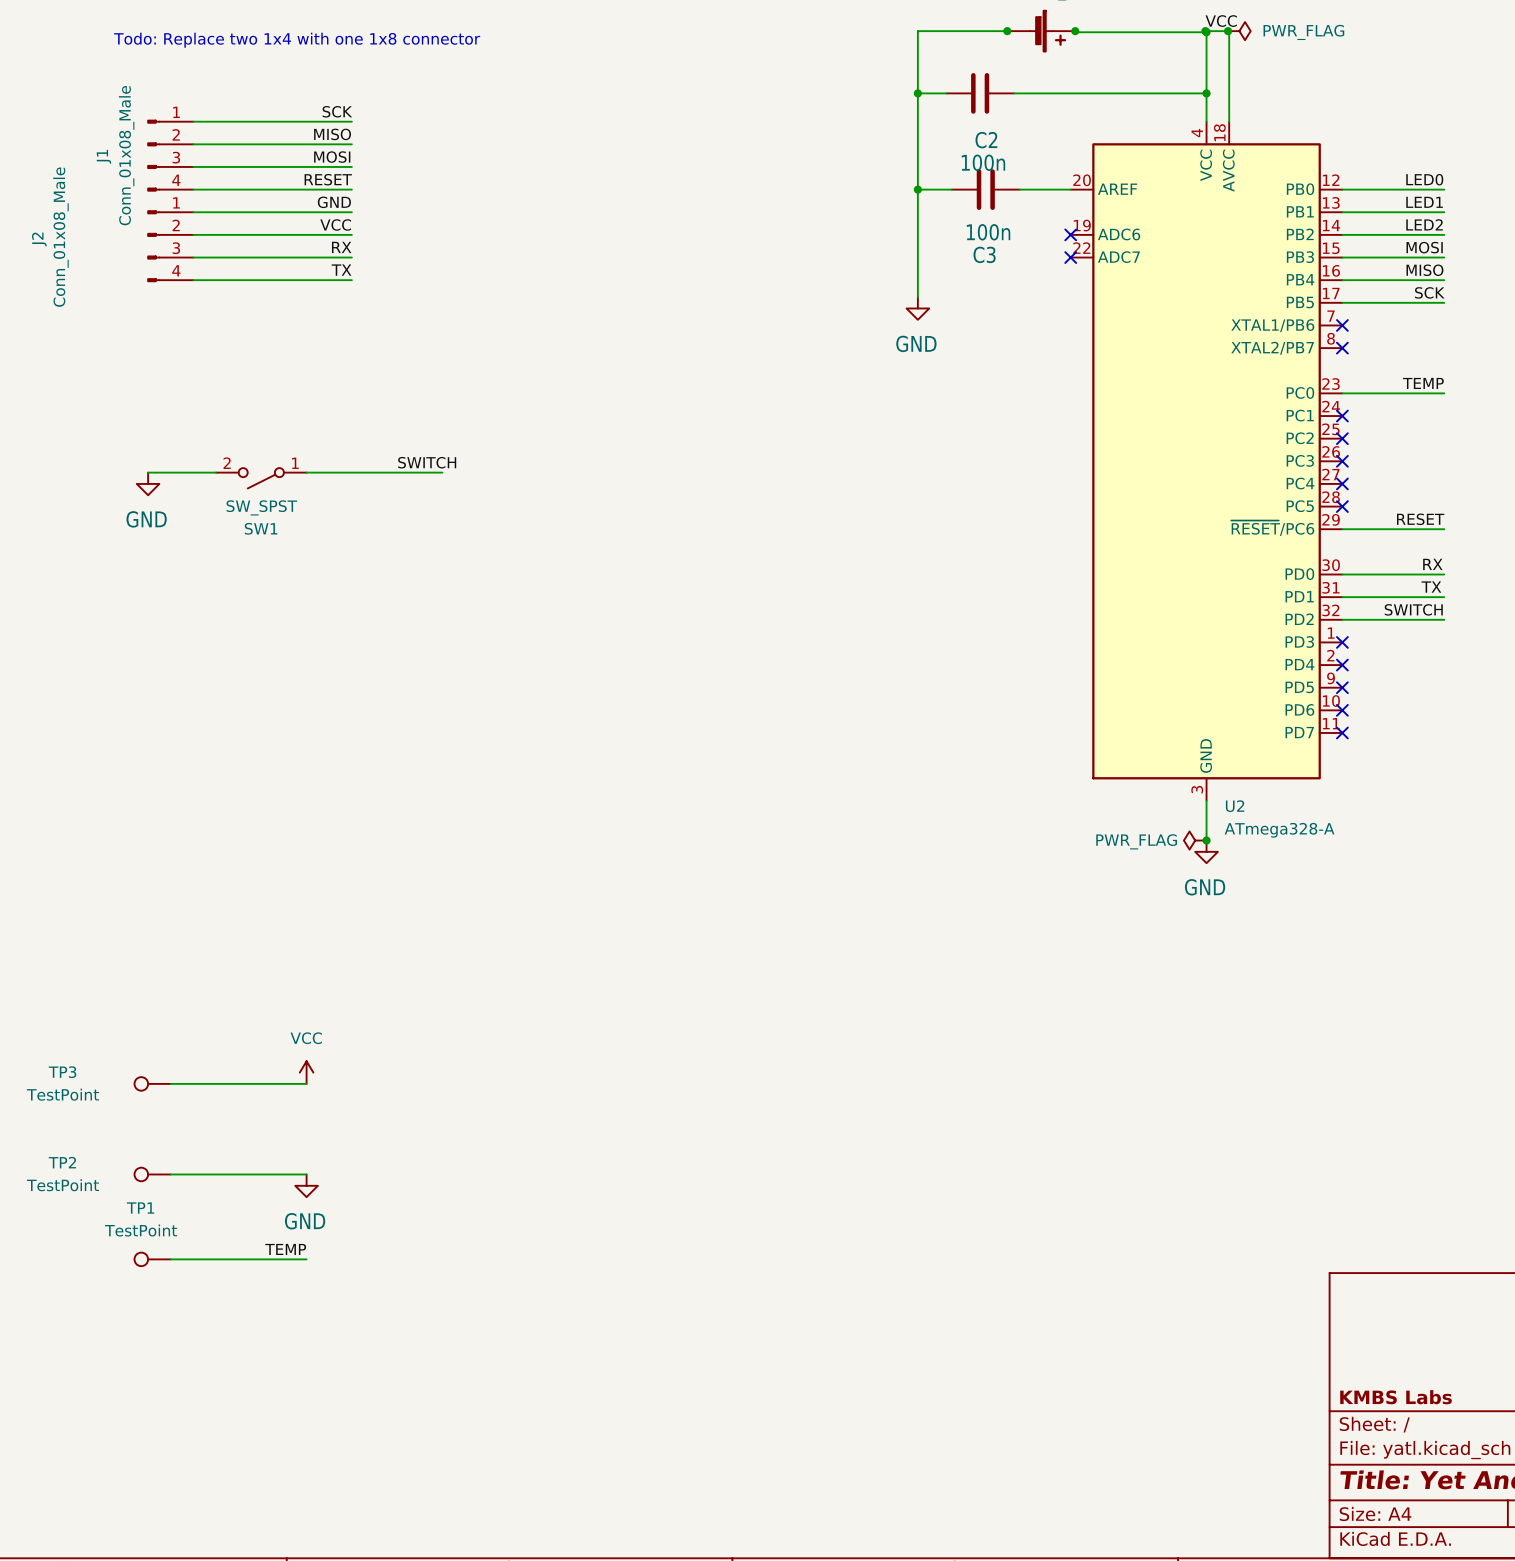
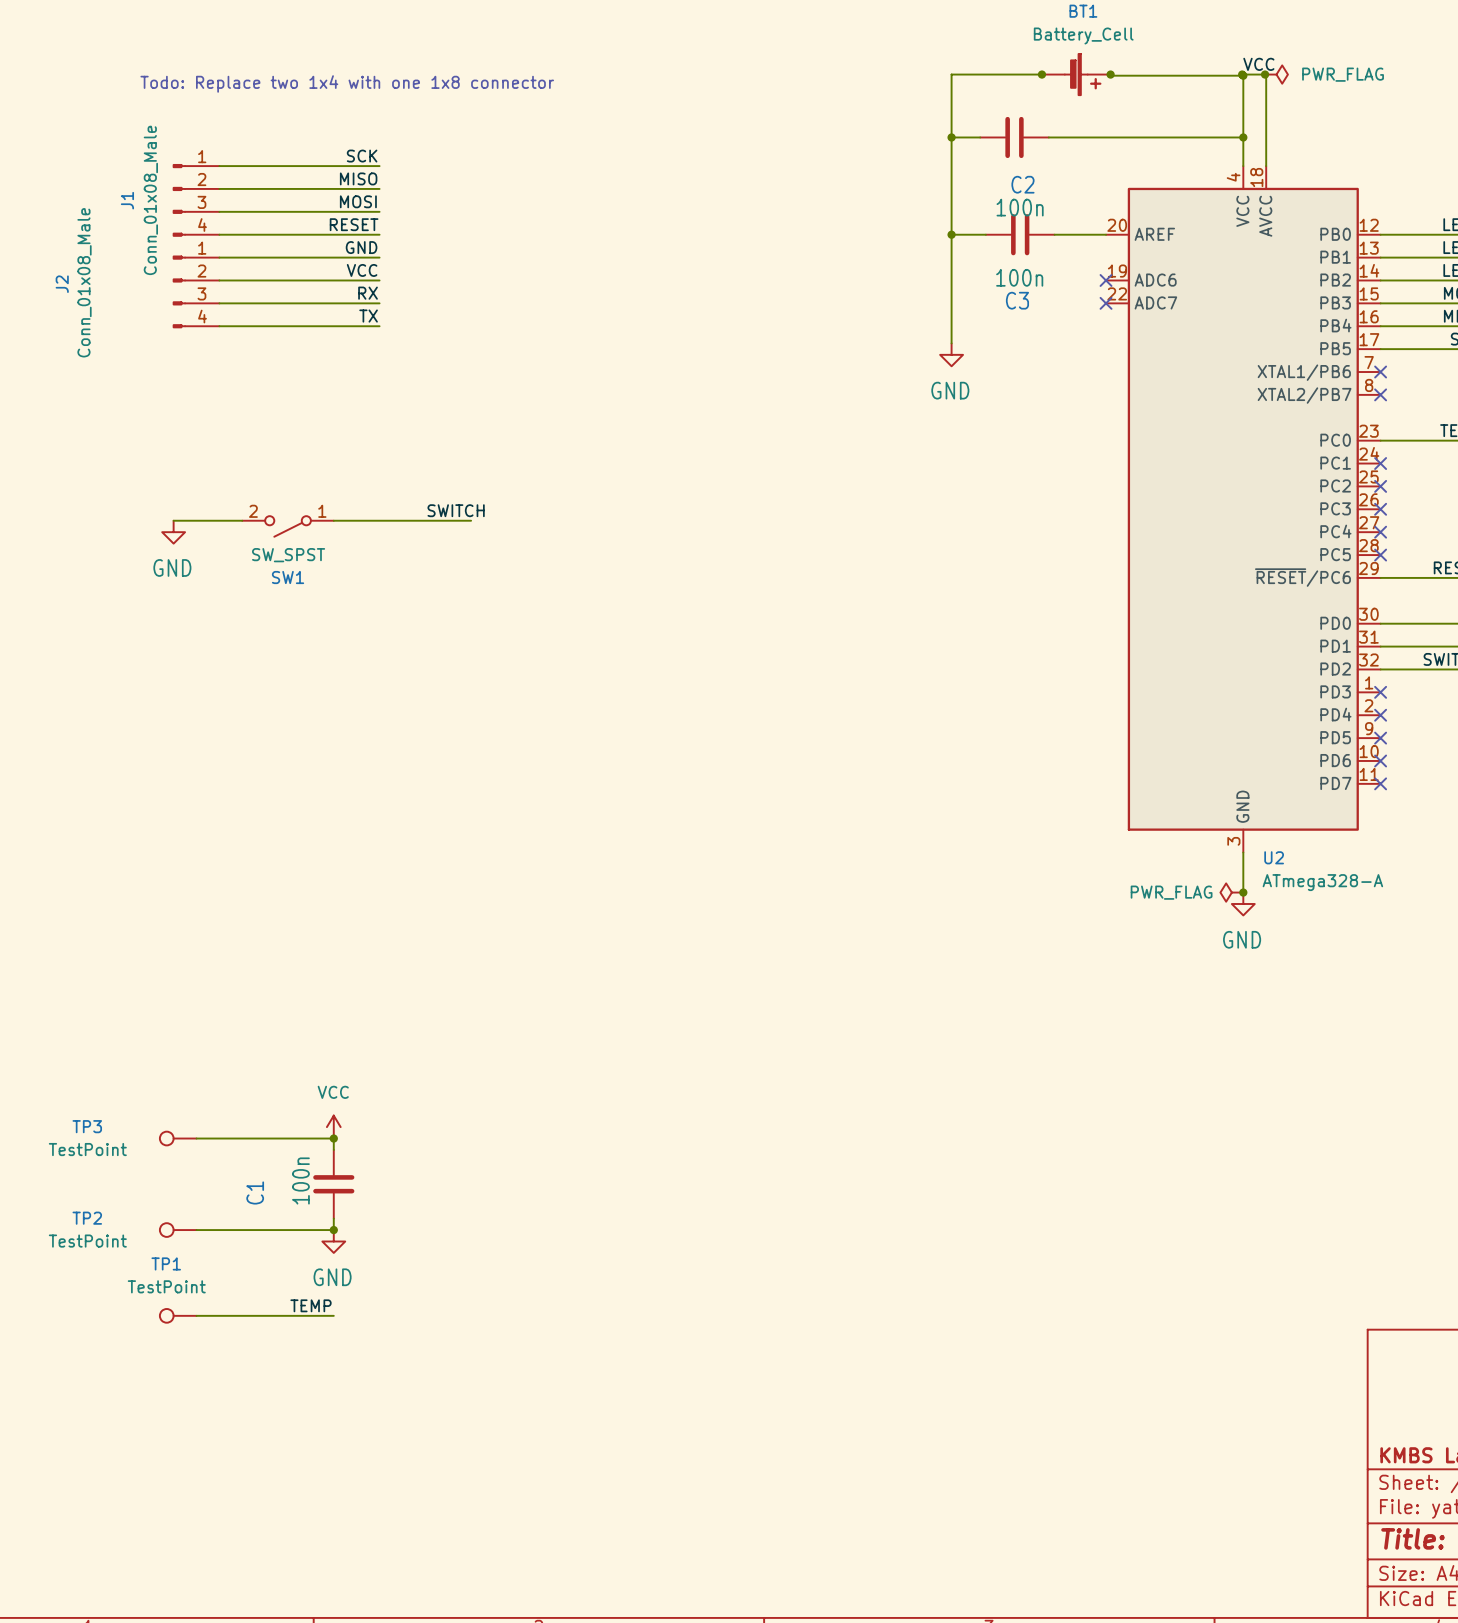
wire: none -> (333, 1138) (333, 1149)
junction: none -> (333, 1138)
C1: none -> 100n (333, 1184)
wire: none -> (333, 1218) (333, 1230)
junction: none -> (333, 1230)

